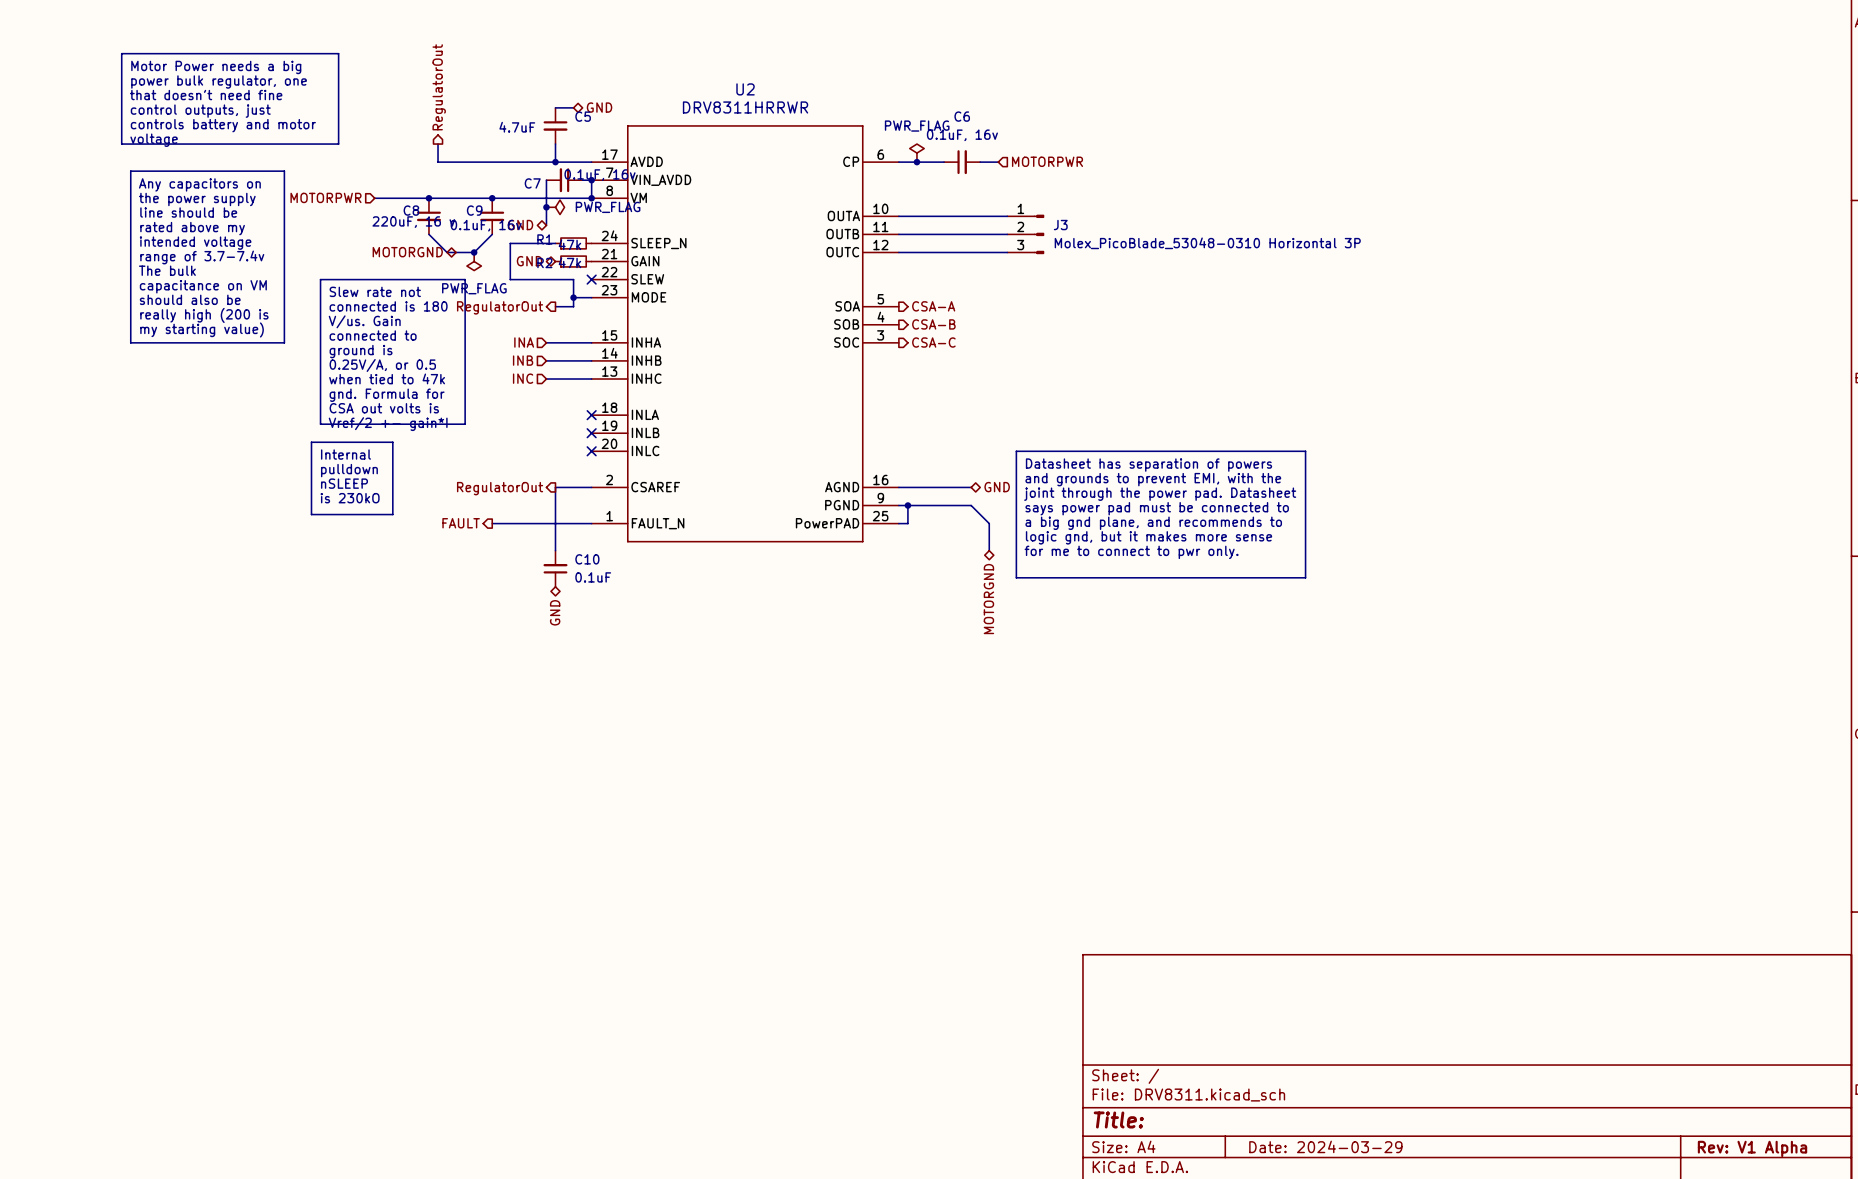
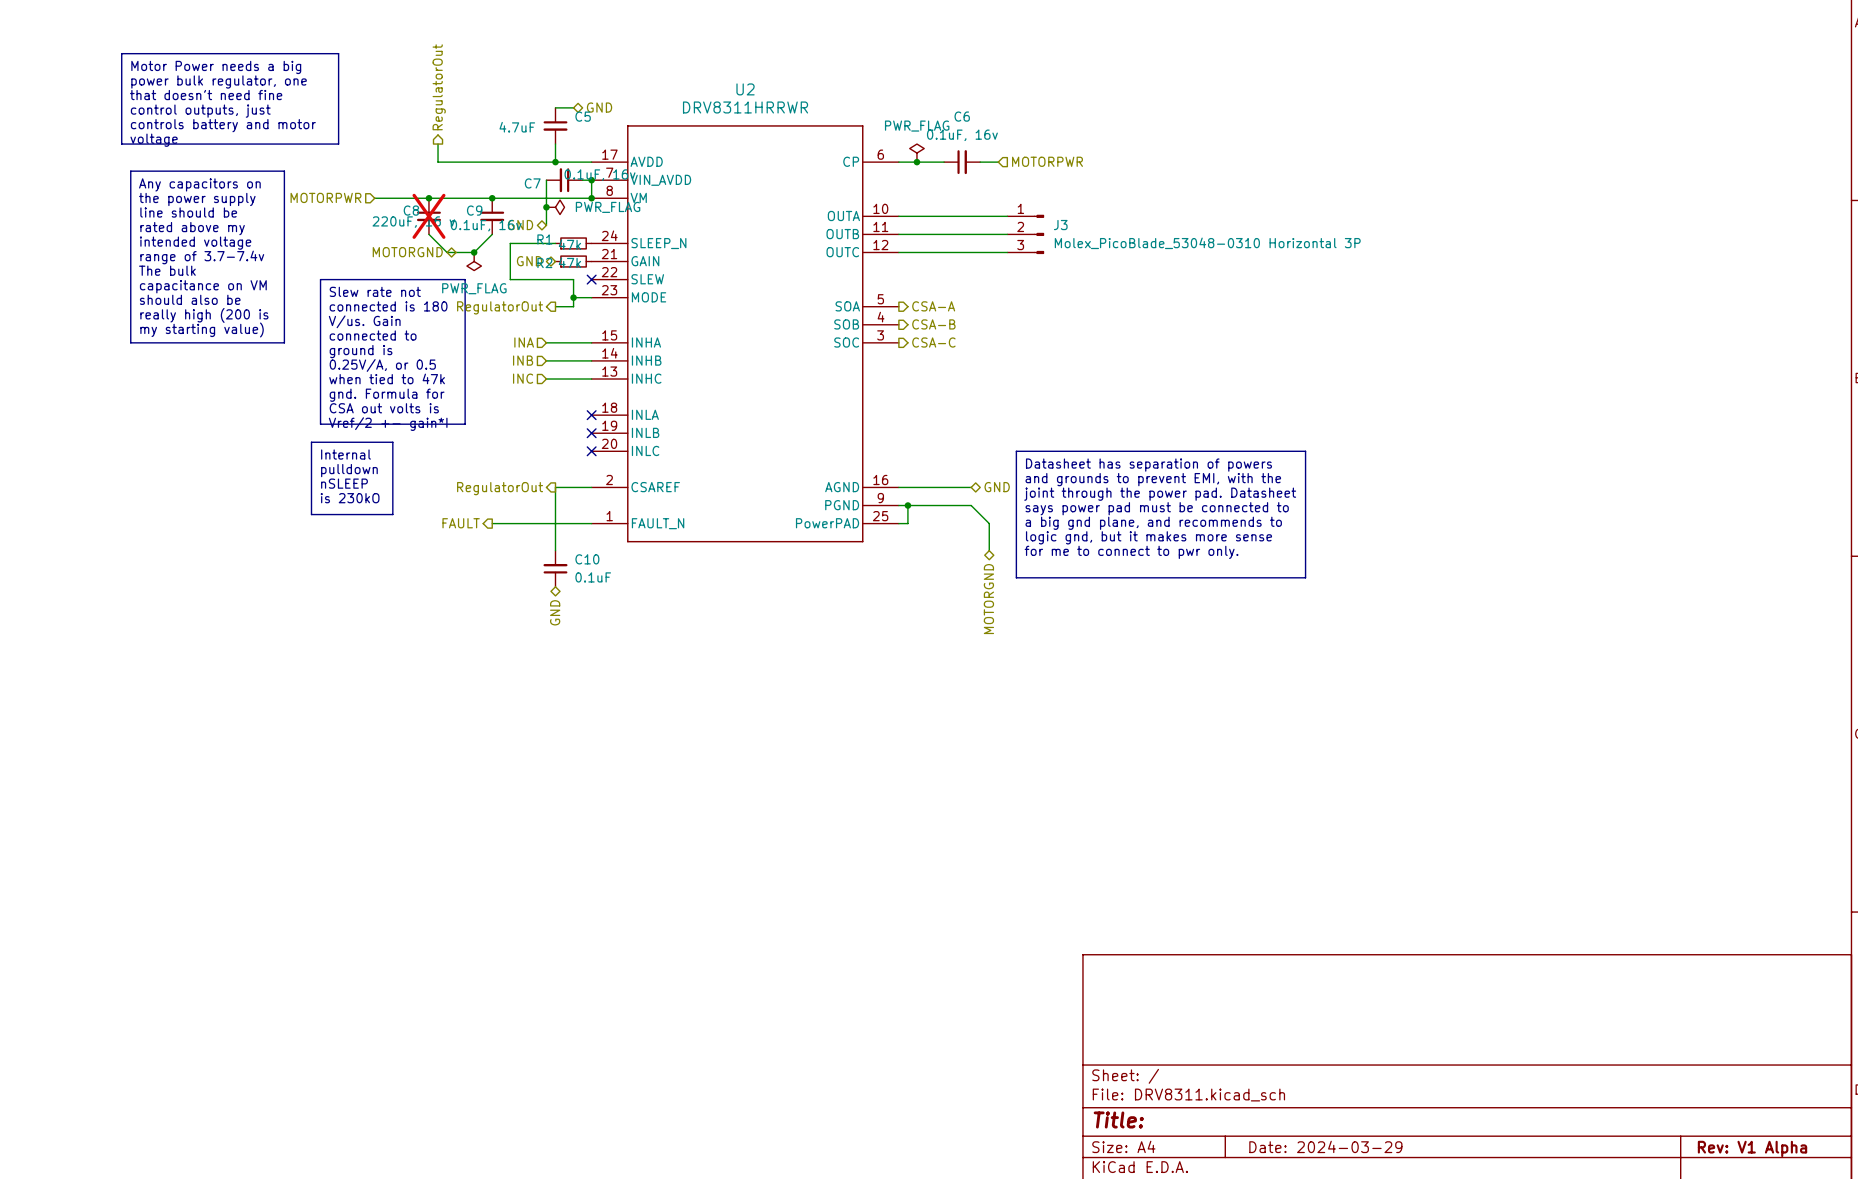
C8 do-not-place cross: none -> (428, 216)

